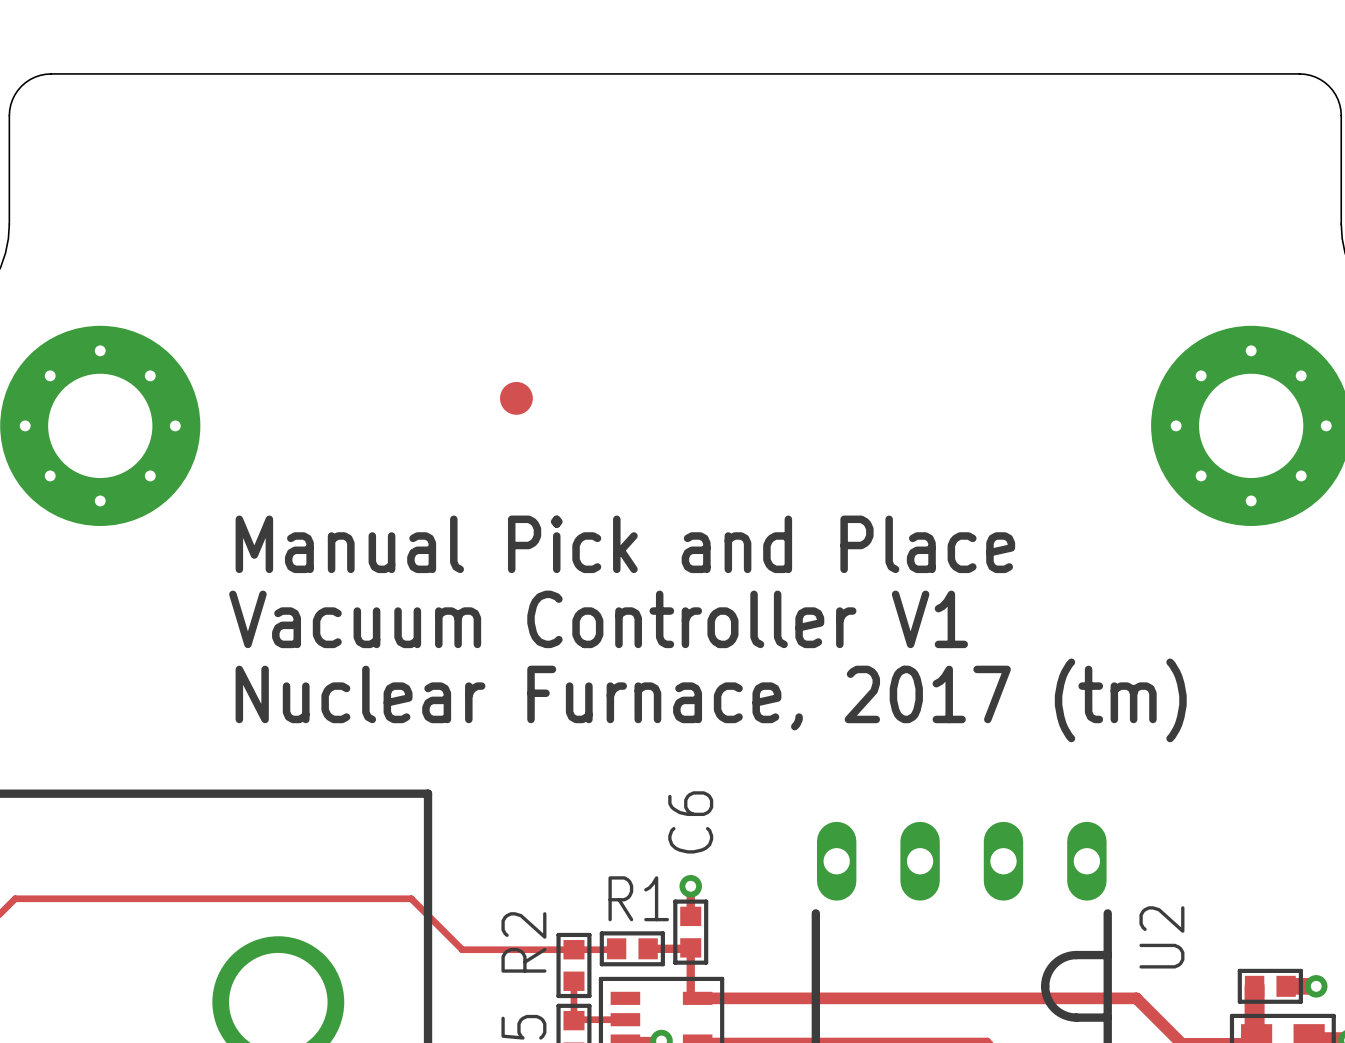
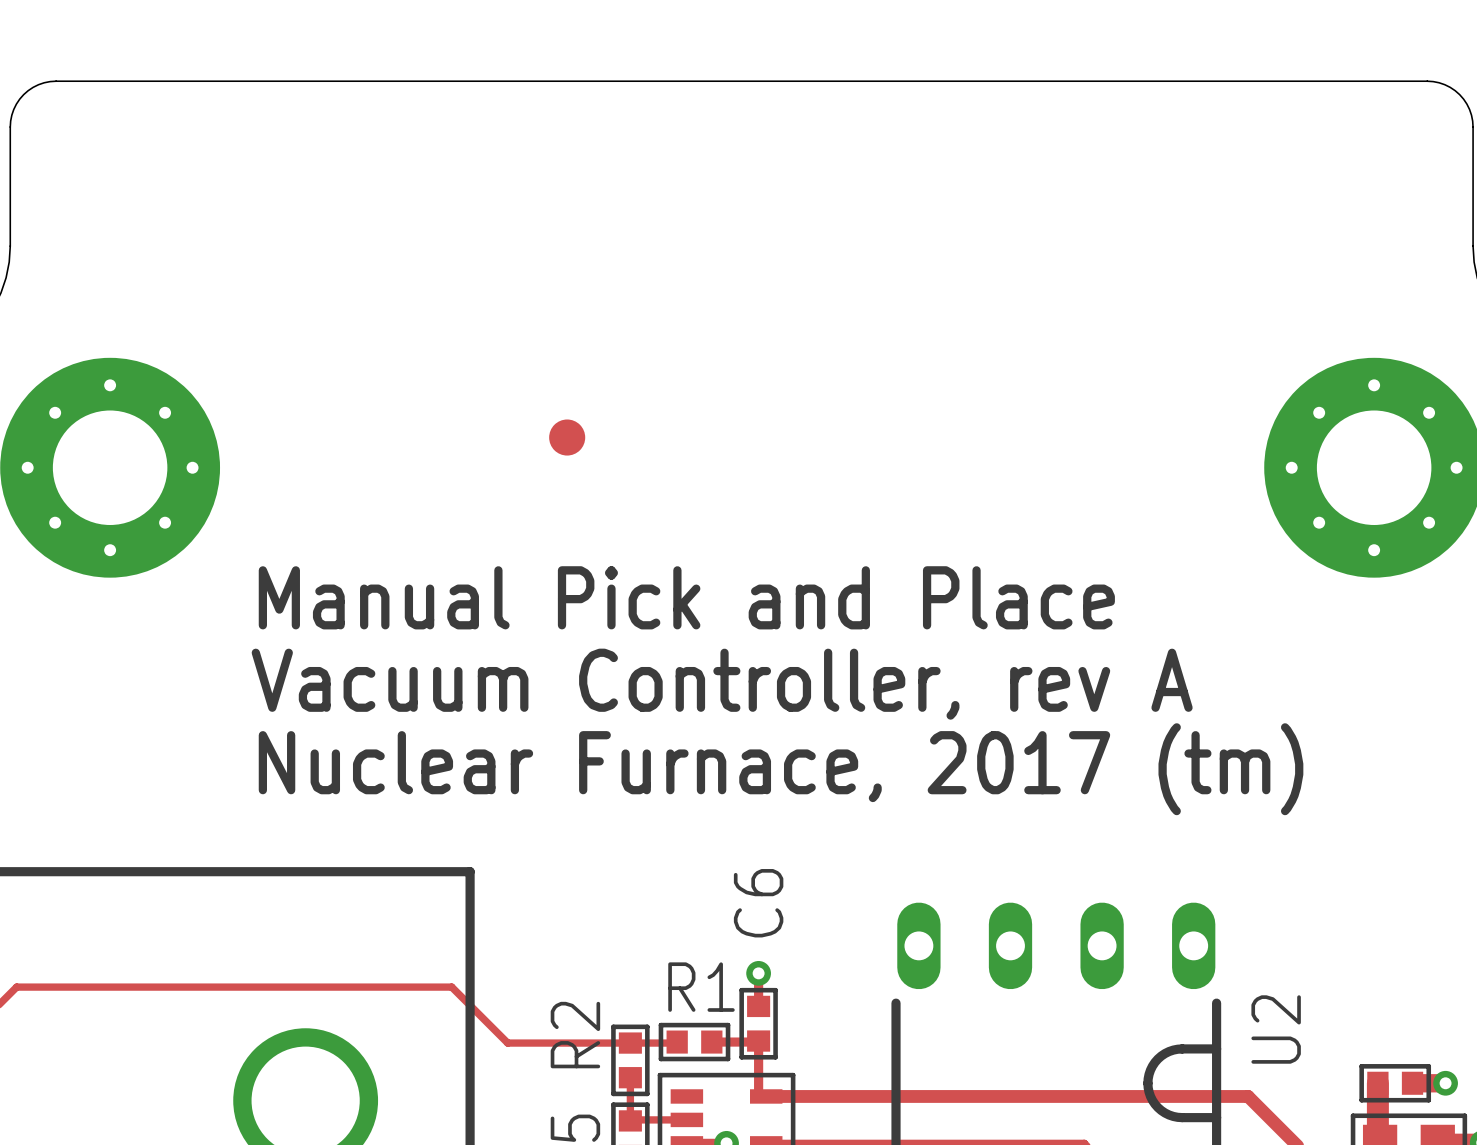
text: Vacuum Controller V1 (598, 619) -> Vacuum Controller, rev A (722, 684)

